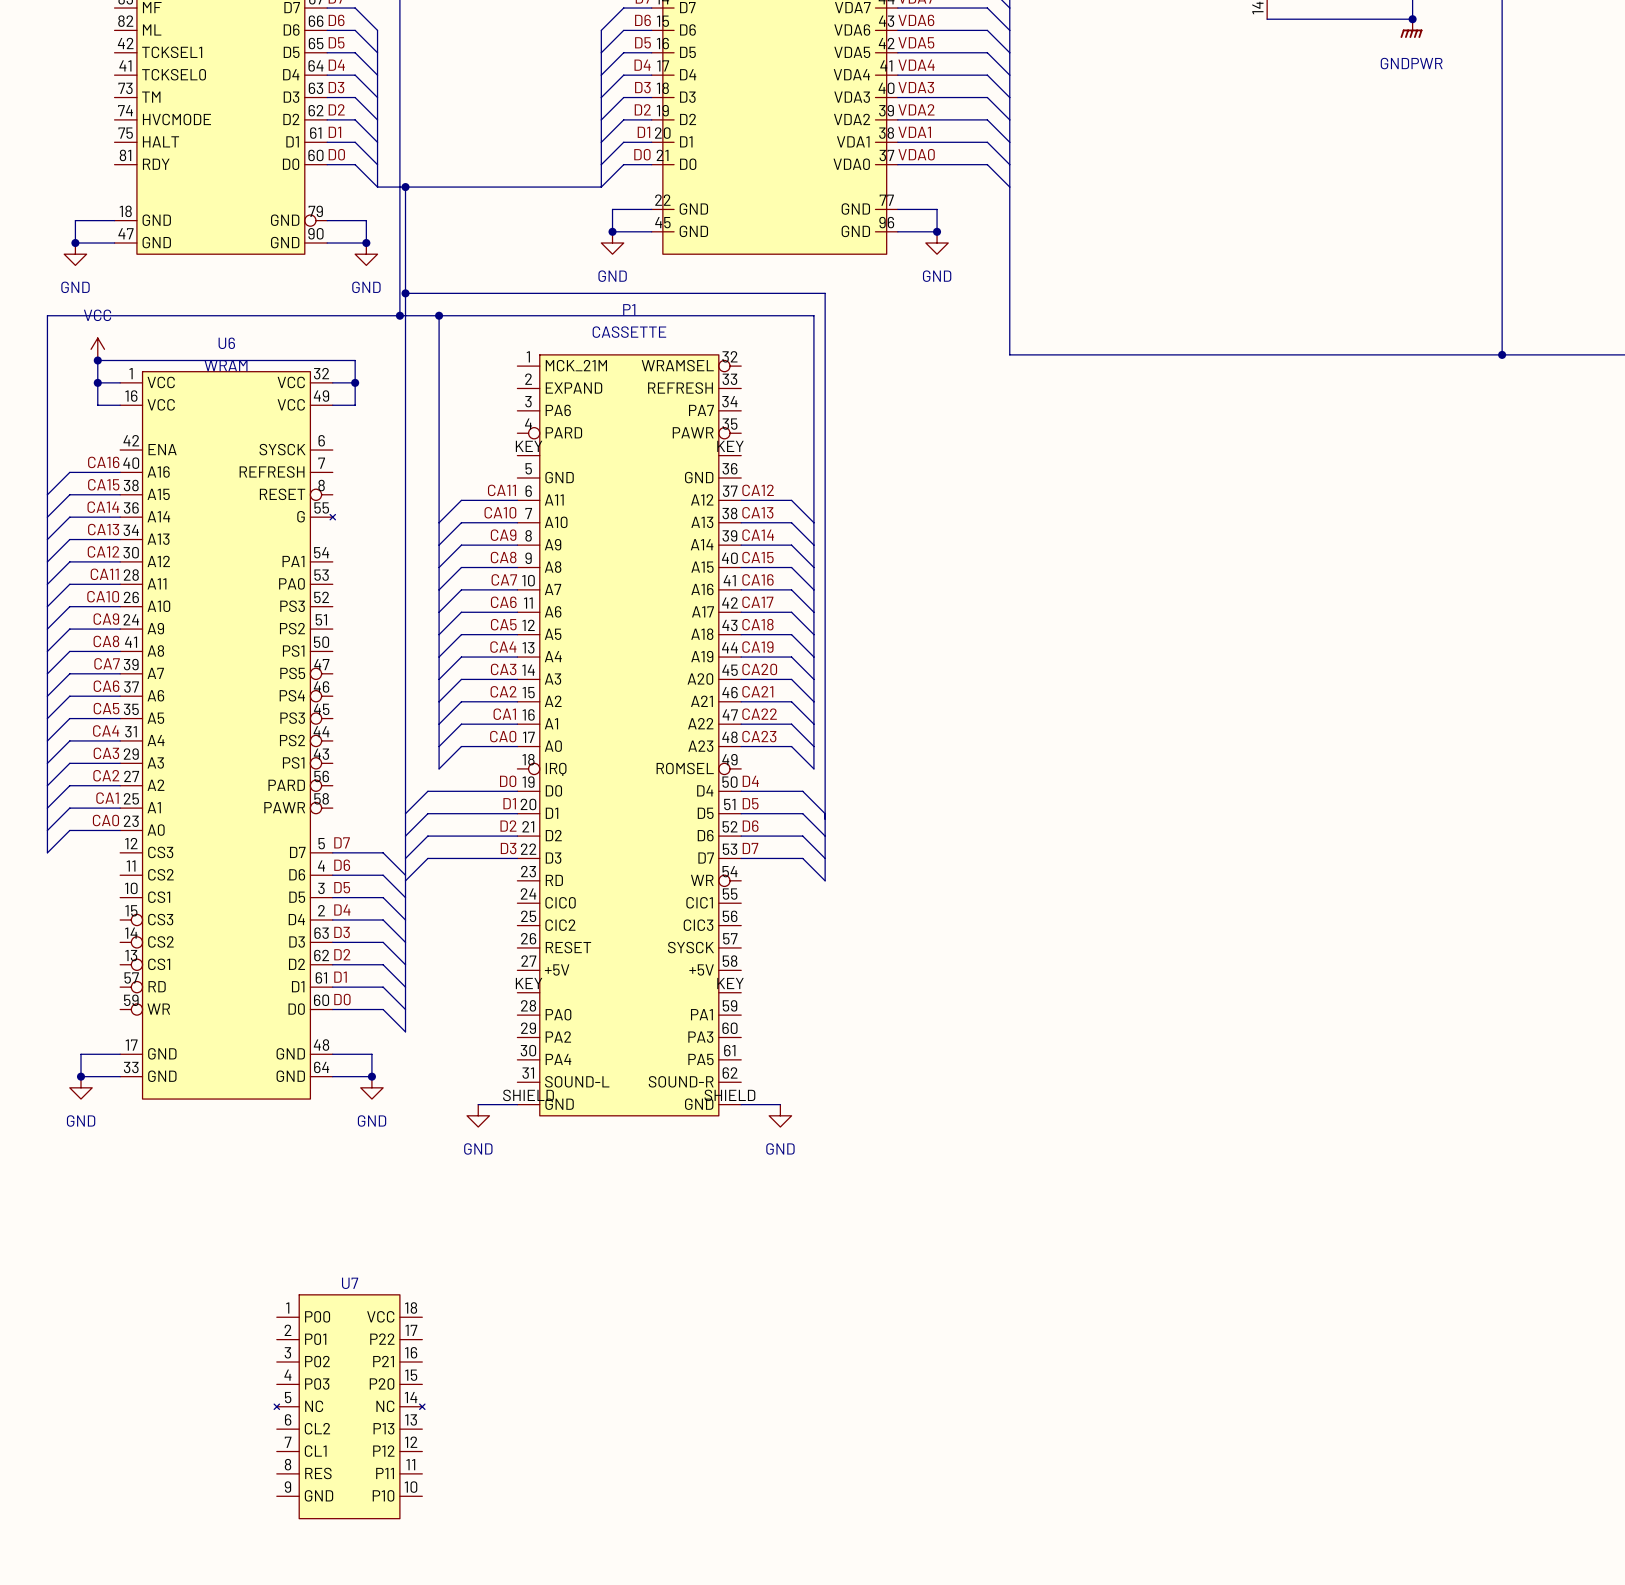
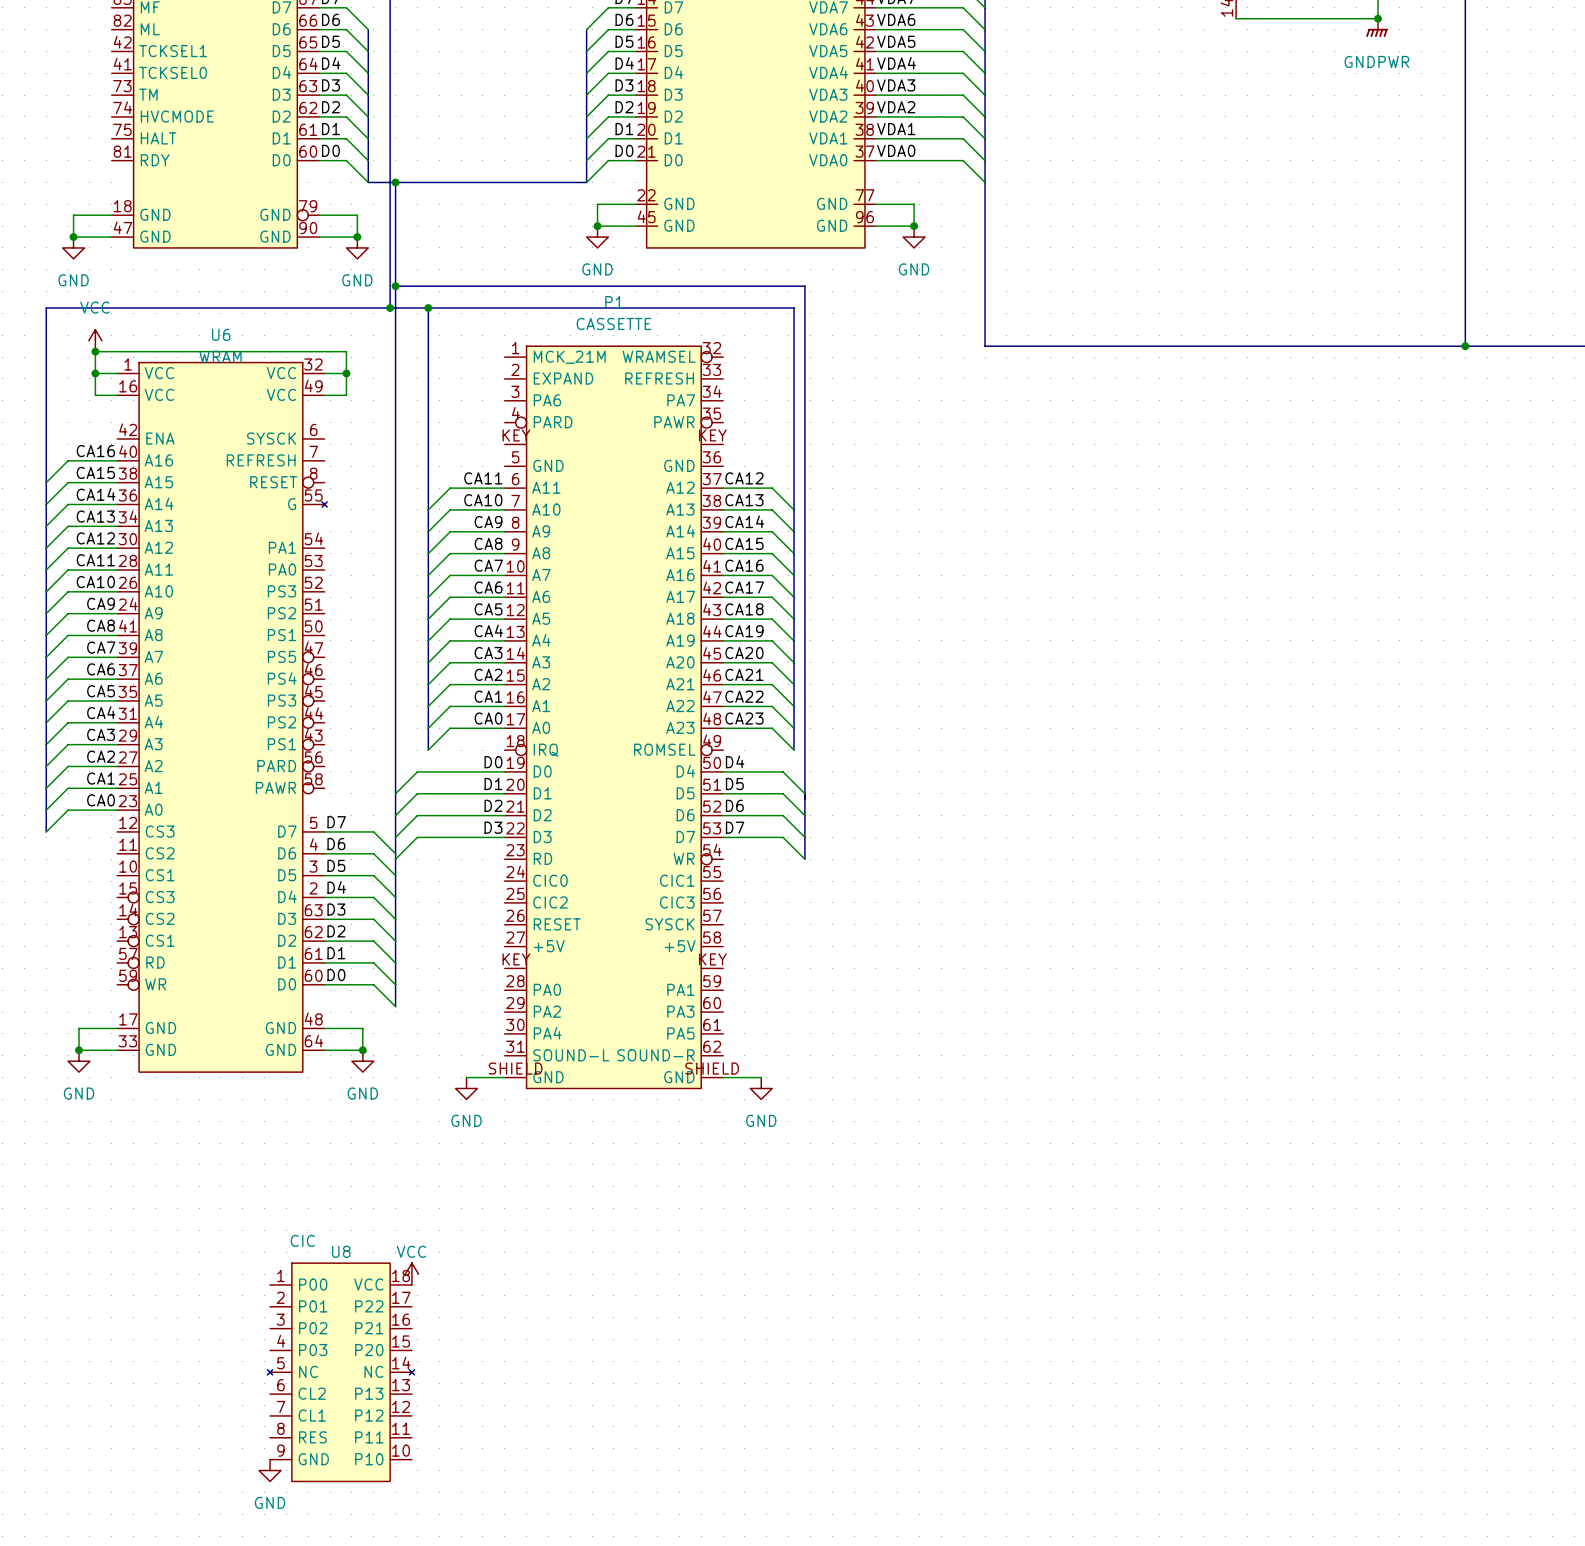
U7 value: none -> CIC (302, 1240)
U7 name: U7 (350, 1283) -> U8 (341, 1251)
power symbol: none -> VCC (411, 1274)
power symbol: none -> GND (270, 1470)

